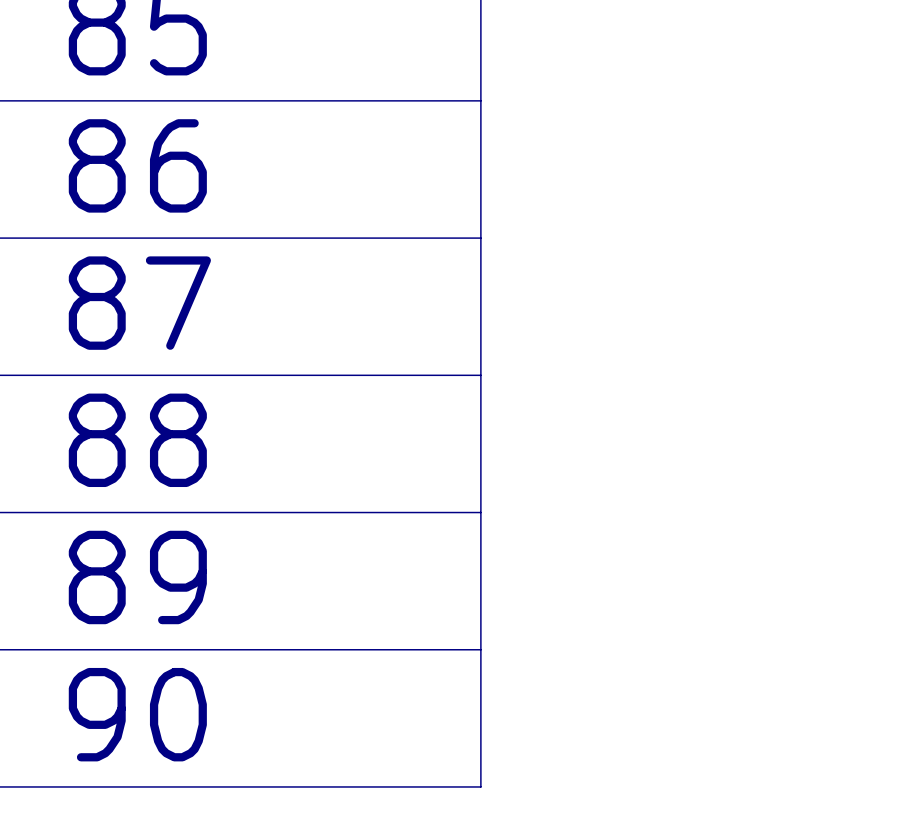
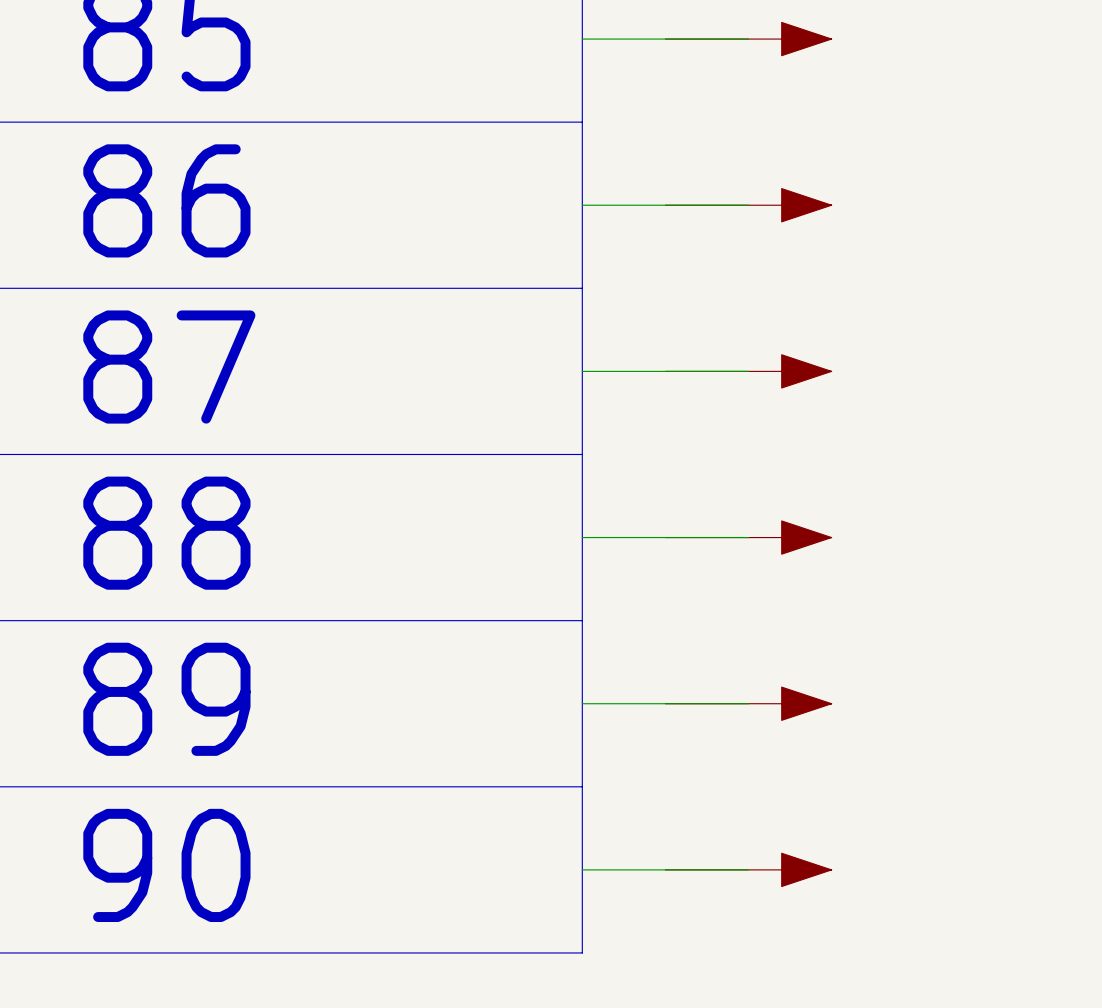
wire: none -> (582, 39) (748, 39)
power symbol: none -> (748, 39)
wire: none -> (582, 205) (748, 205)
power symbol: none -> (748, 205)
wire: none -> (582, 371) (748, 371)
power symbol: none -> (748, 371)
wire: none -> (582, 537) (748, 537)
power symbol: none -> (748, 537)
wire: none -> (582, 703) (748, 703)
power symbol: none -> (748, 703)
wire: none -> (582, 869) (748, 869)
power symbol: none -> (748, 869)

